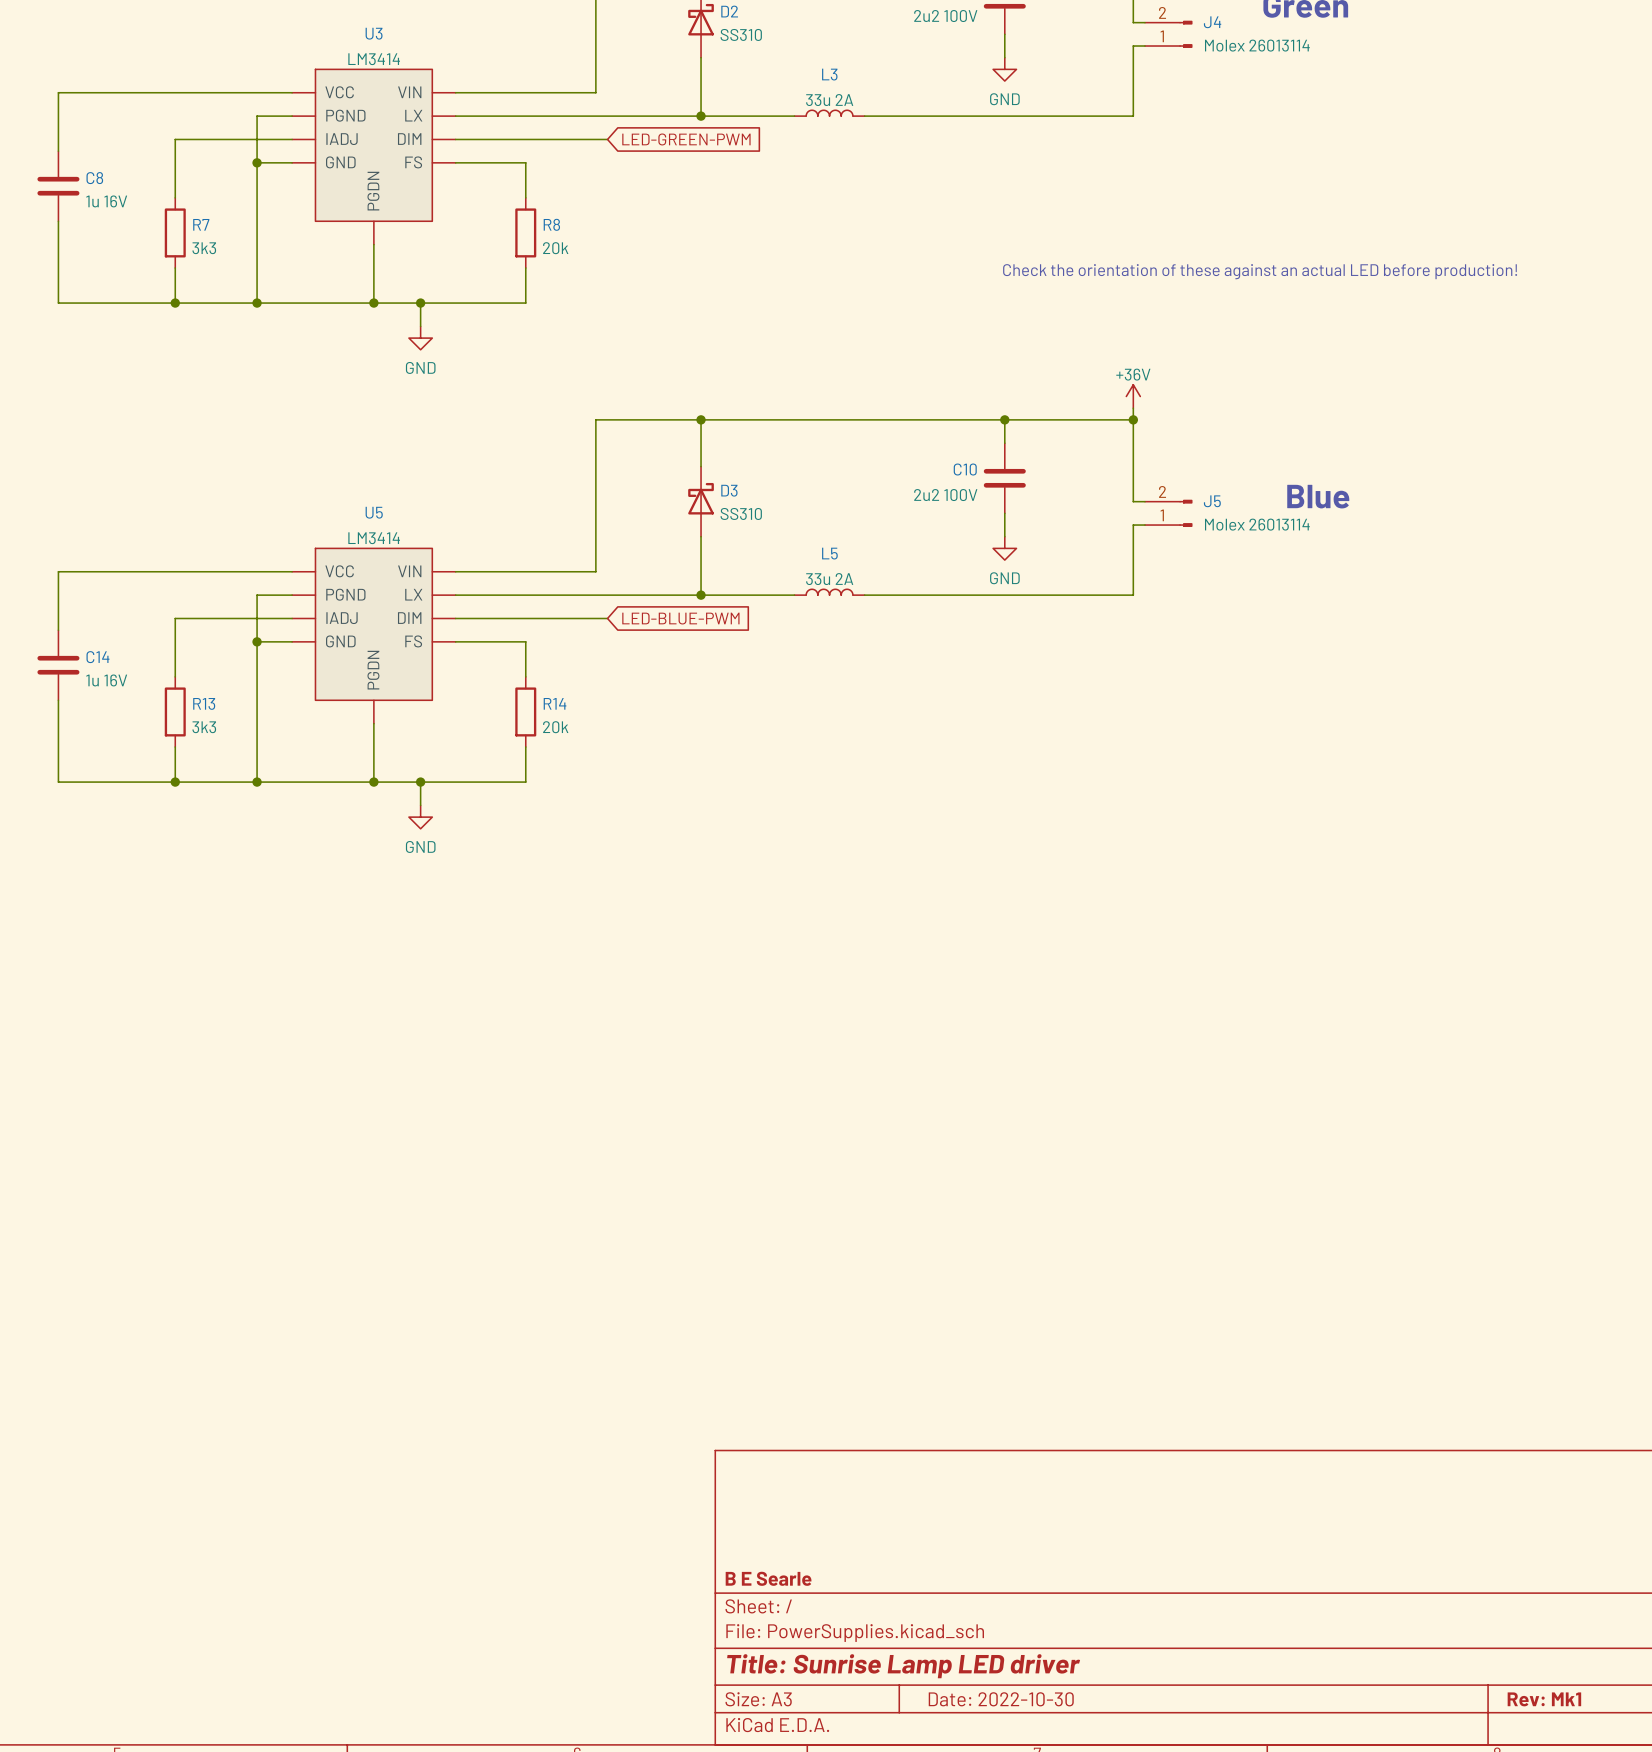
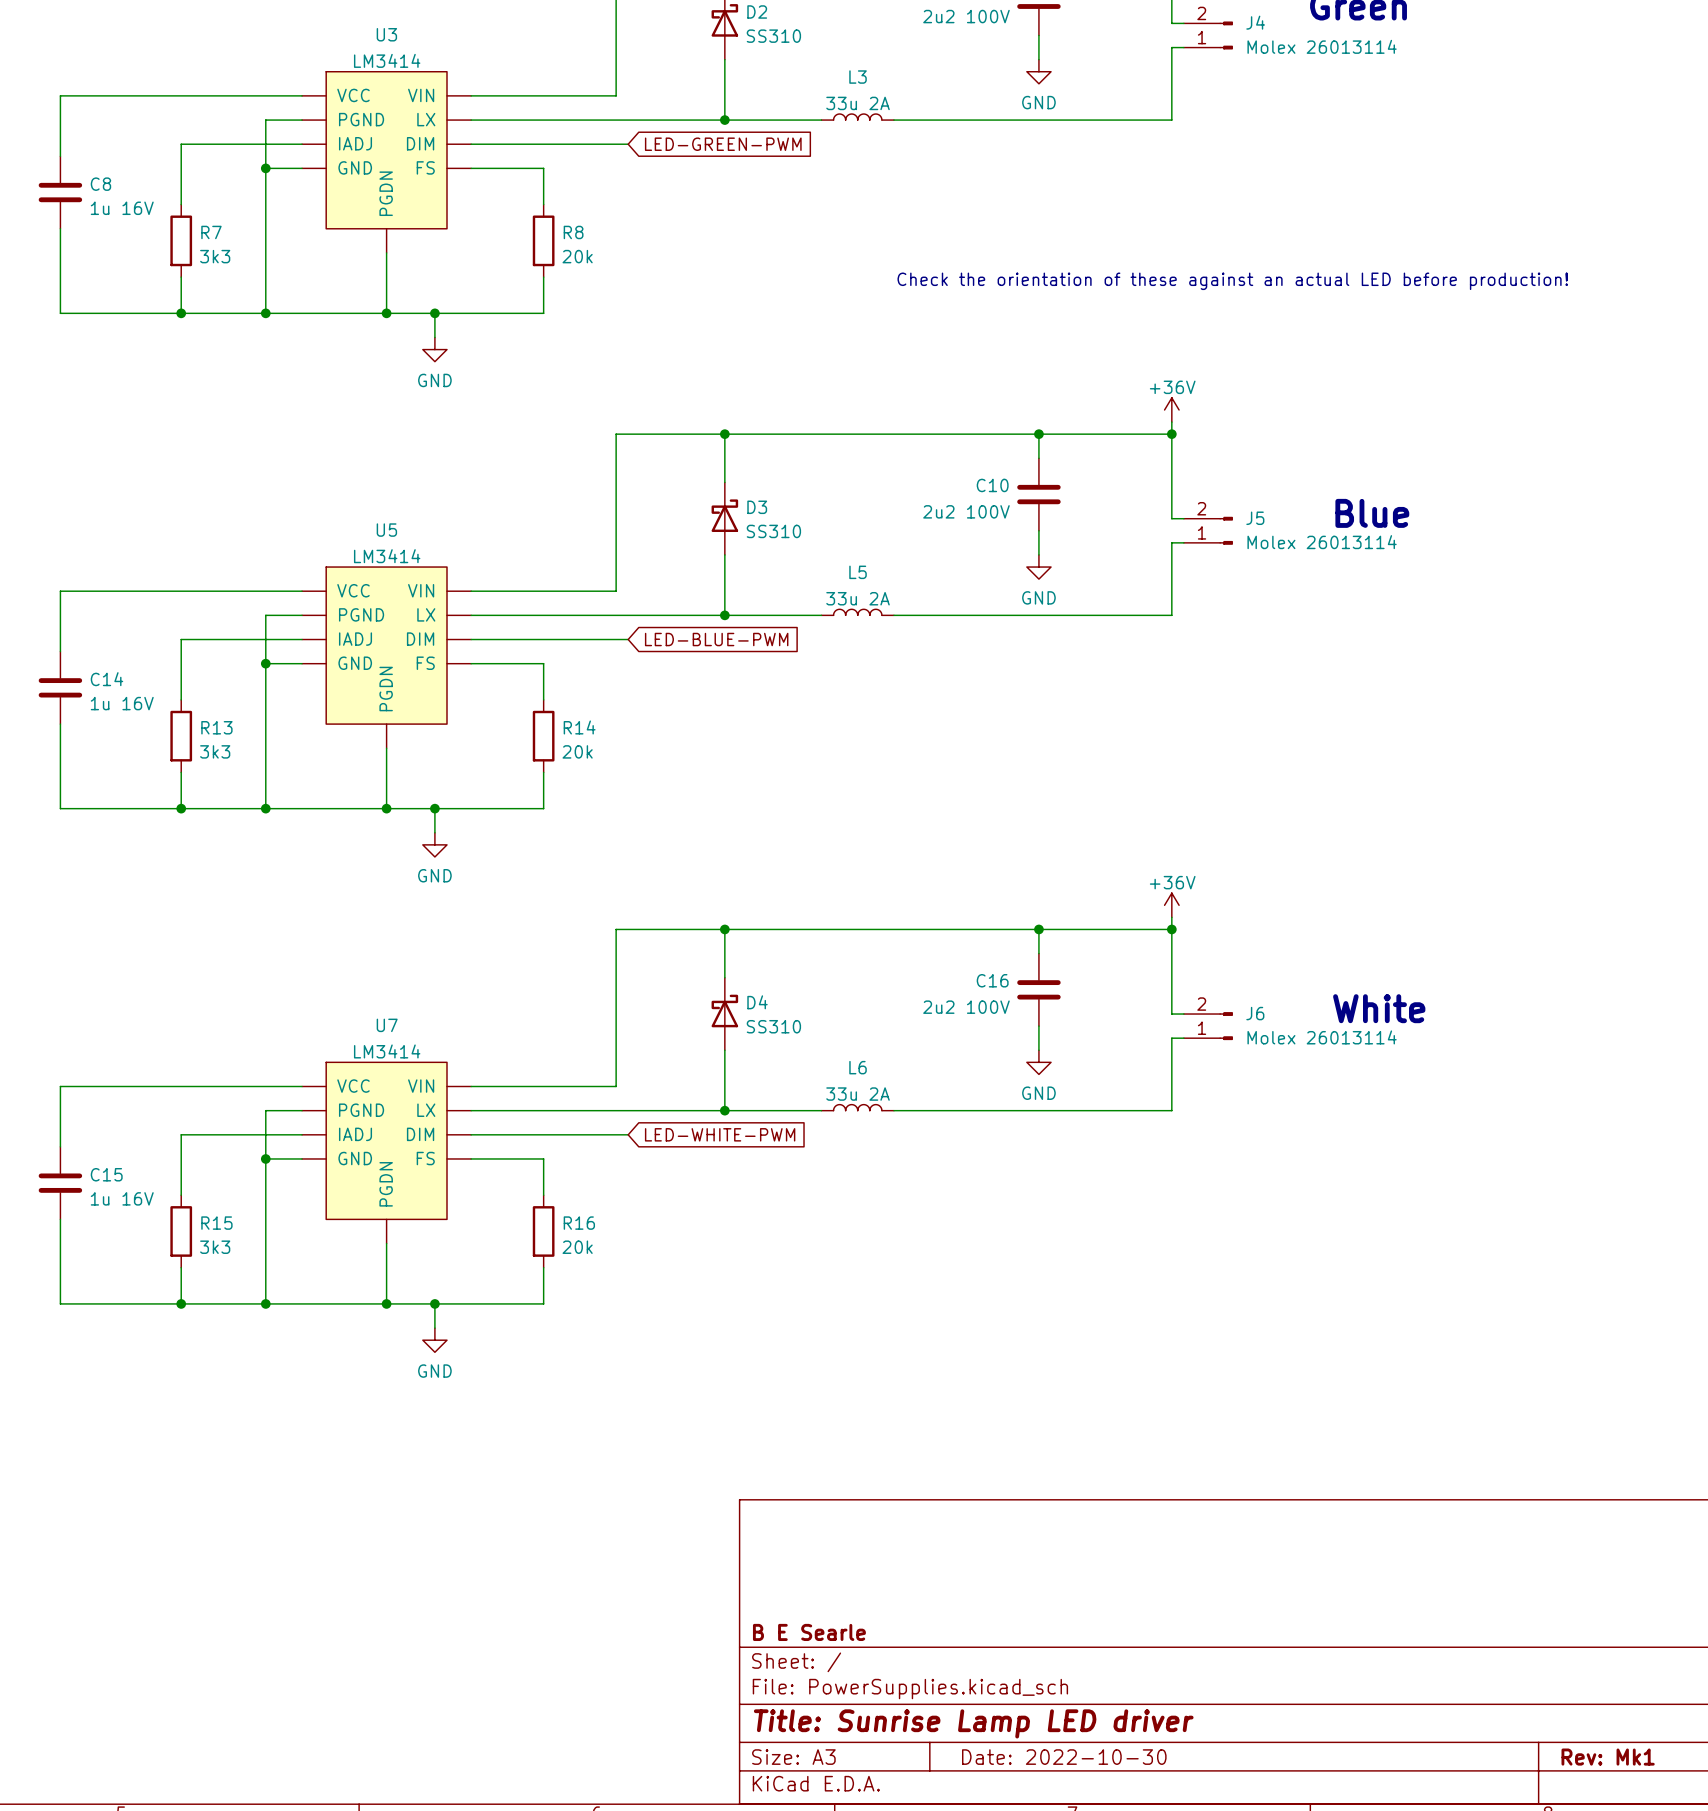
power symbol: none -> +36V (1171, 905)
wire: none -> (1171, 917) (1171, 1014) (1183, 1014)
wire: none -> (724, 929) (724, 977)
junction: none -> (724, 929)
wire: none -> (1038, 929) (1038, 953)
junction: none -> (1038, 929)
wire: none -> (1171, 929) (616, 929) (616, 1086) (471, 1086)
junction: none -> (1171, 929)
C16: none -> 2u2 100V (1038, 989)
text: none -> White (1379, 1008)
D4: none -> SS310 (724, 1014)
wire: none -> (1038, 1026) (1038, 1050)
J6: none -> Molex 26013114 (1208, 1026)
wire: none -> (1183, 1038) (1171, 1038) (1171, 1110) (893, 1110)
wire: none -> (724, 1050) (724, 1110)
power symbol: none -> GND (1038, 1062)
wire: none -> (302, 1086) (60, 1086) (60, 1146)
L6: none -> 33u 2A (857, 1107)
wire: none -> (302, 1110) (265, 1110) (265, 1303)
wire: none -> (471, 1110) (821, 1110)
junction: none -> (724, 1110)
wire: none -> (302, 1134) (181, 1134) (181, 1195)
wire: none -> (471, 1134) (628, 1134)
global label: none -> LED-WHITE-PWM (720, 1134)
U7: none -> LM3414 (386, 1152)
wire: none -> (265, 1158) (302, 1158)
junction: none -> (265, 1158)
wire: none -> (471, 1158) (543, 1158) (543, 1195)
C15: none -> 1u 16V (60, 1183)
wire: none -> (60, 1219) (60, 1303) (543, 1303) (543, 1267)
R15: none -> 3k3 (181, 1231)
R16: none -> 20k (543, 1231)
wire: none -> (386, 1243) (386, 1303)
wire: none -> (181, 1267) (181, 1303)
junction: none -> (181, 1303)
junction: none -> (265, 1303)
junction: none -> (386, 1303)
wire: none -> (434, 1303) (434, 1328)
junction: none -> (434, 1303)
power symbol: none -> GND (434, 1340)

